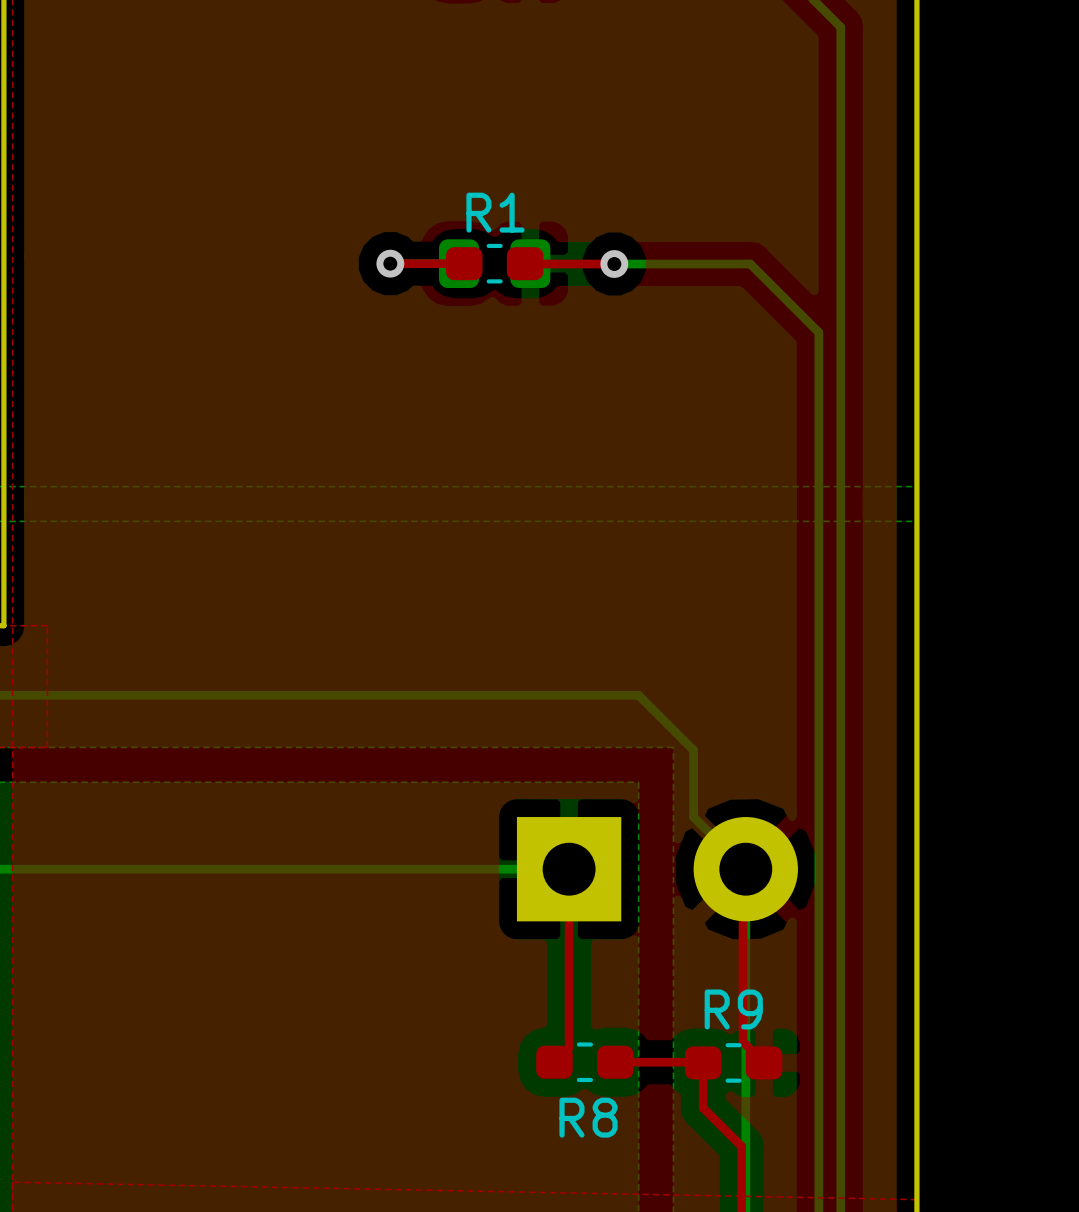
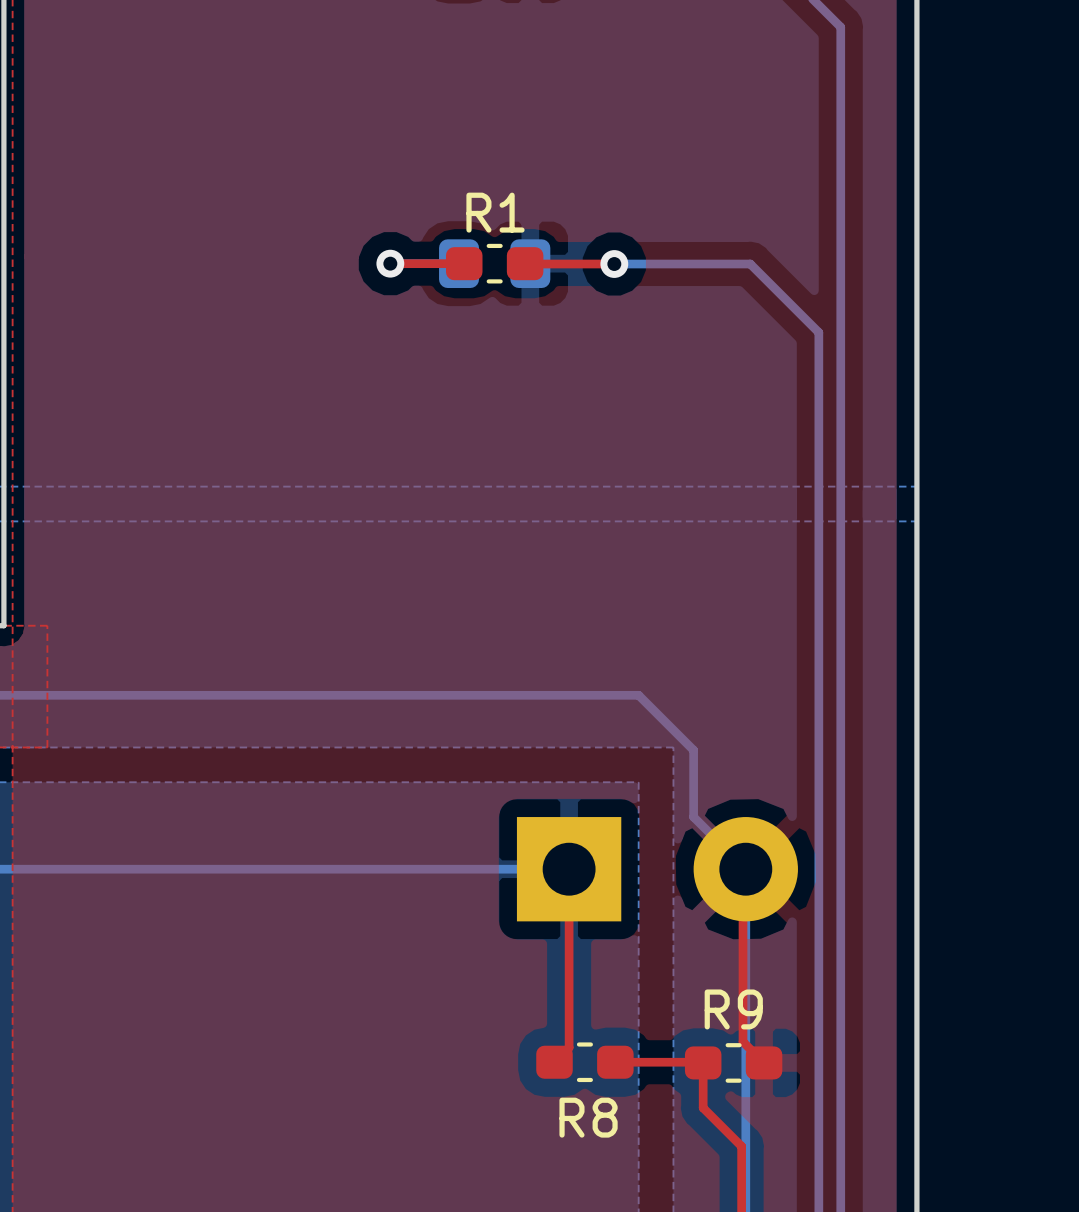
top zone outline: (12, 1182) (916, 1199) -> none

